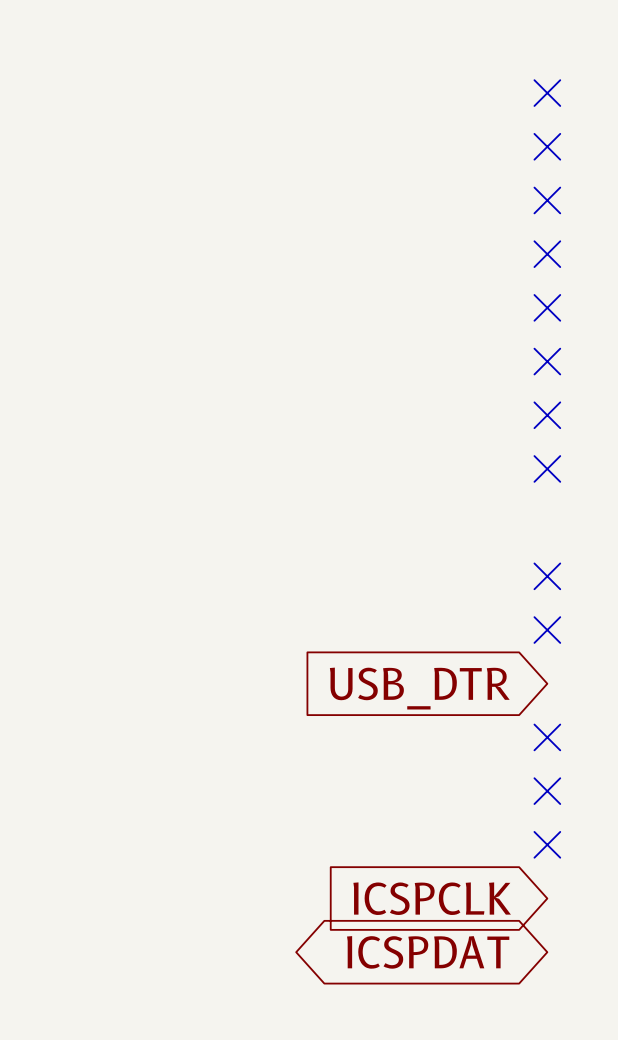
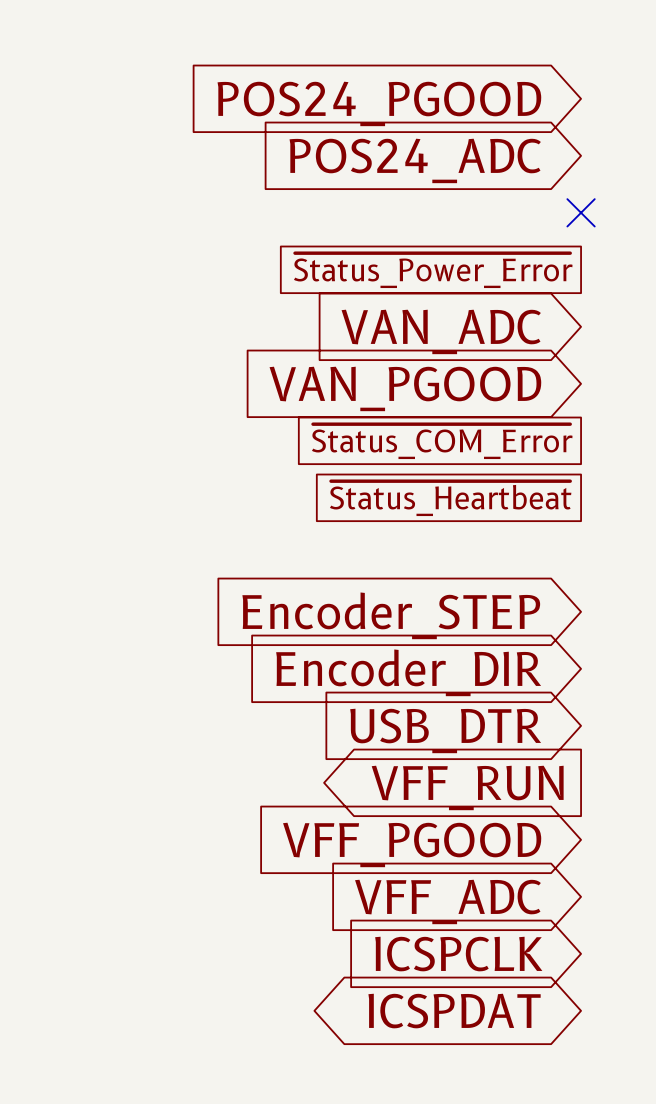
no-connect mark: (547, 93) -> none
global label: none -> POS24_PGOOD (379, 103)
no-connect mark: (547, 146) -> none
global label: none -> POS24_ADC (415, 160)
global label: none -> ~{Status_Power_Error} (433, 270)
no-connect mark: (547, 254) -> none
no-connect mark: (547, 307) -> none
global label: none -> VAN_ADC (441, 331)
no-connect mark: (547, 361) -> none
global label: none -> VAN_PGOOD (405, 388)
no-connect mark: (547, 415) -> none
global label: none -> ~{Status_COM_Error} (442, 441)
no-connect mark: (547, 468) -> none
global label: none -> ~{Status_Heartbeat} (450, 498)
no-connect mark: (547, 576) -> none
global label: none -> Encoder_STEP (391, 615)
no-connect mark: (547, 630) -> none
global label: none -> Encoder_DIR (408, 672)
no-connect mark: (547, 737) -> none
global label: none -> VFF_RUN (467, 787)
no-connect mark: (547, 791) -> none
global label: none -> VFF_PGOOD (412, 844)
no-connect mark: (547, 844) -> none
global label: none -> VFF_ADC (447, 901)

